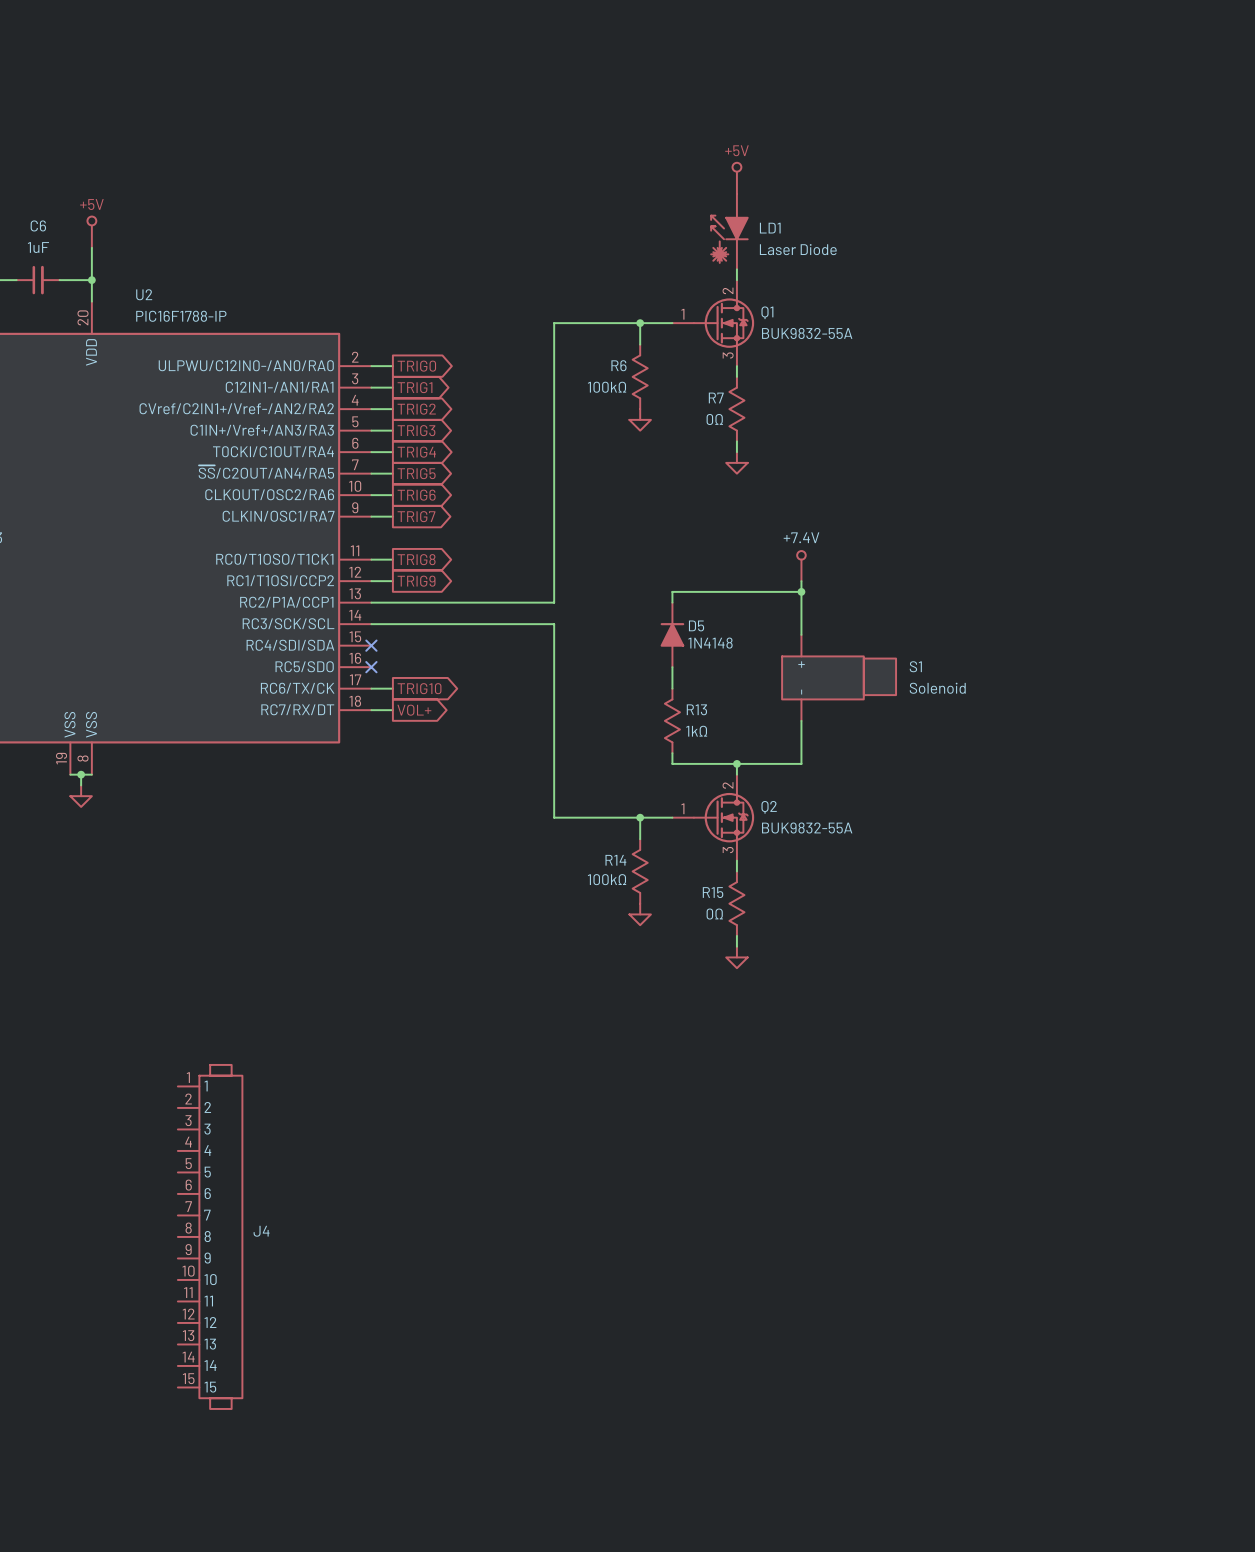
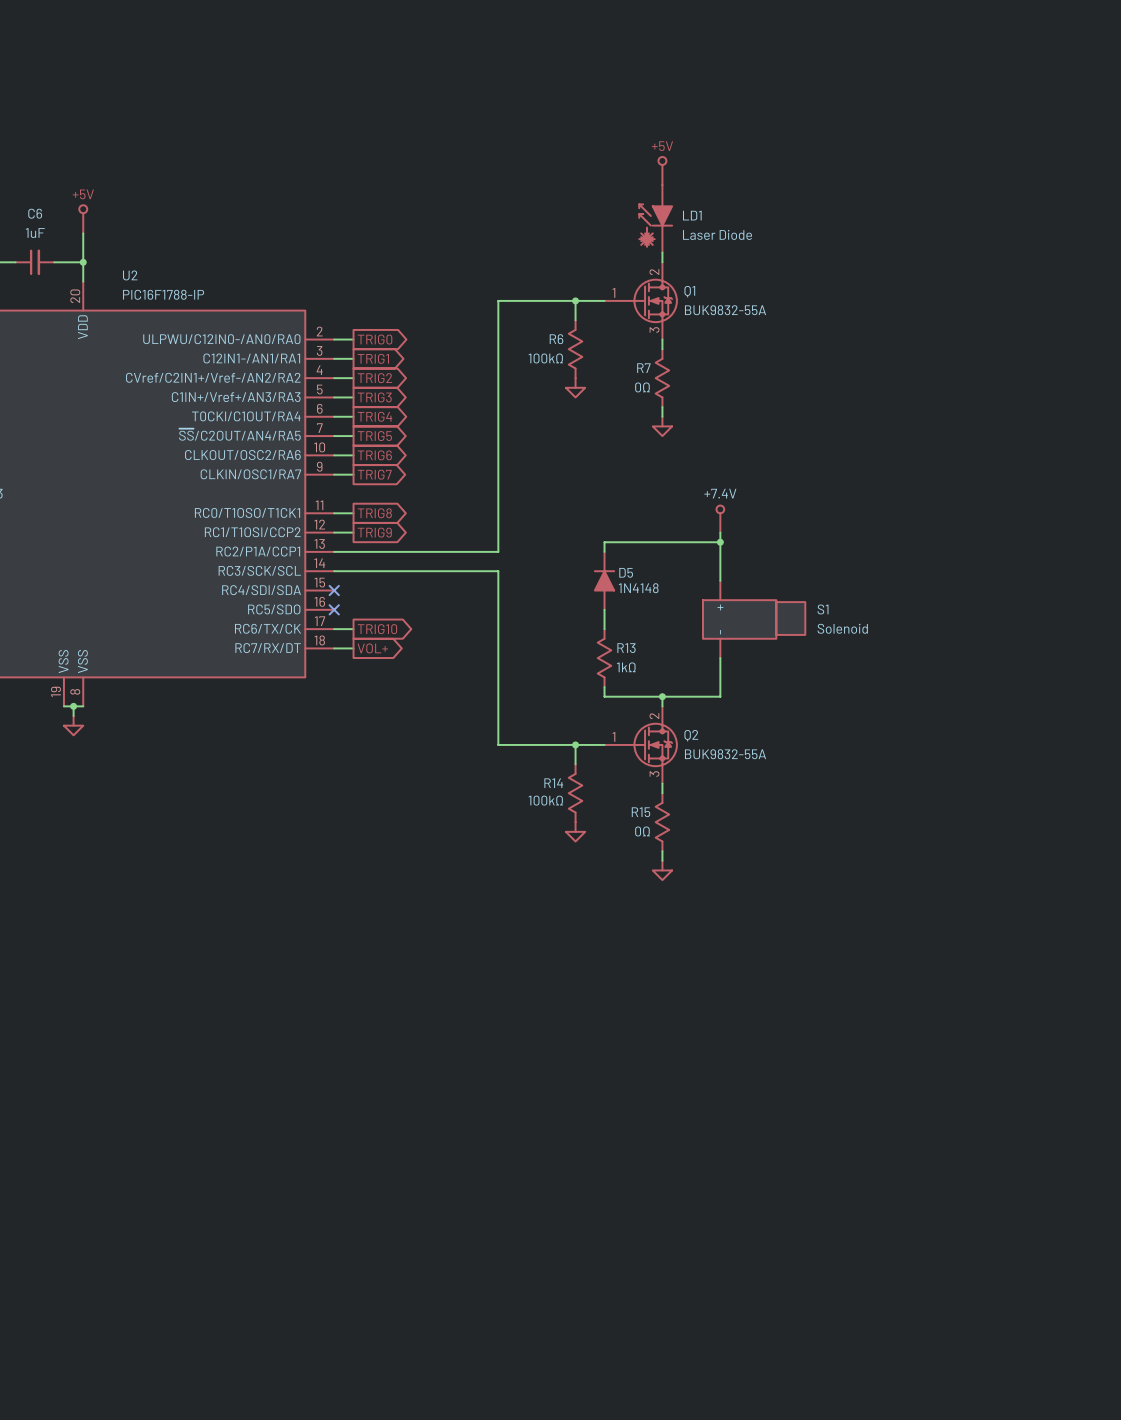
J4: (210, 1236) -> none

